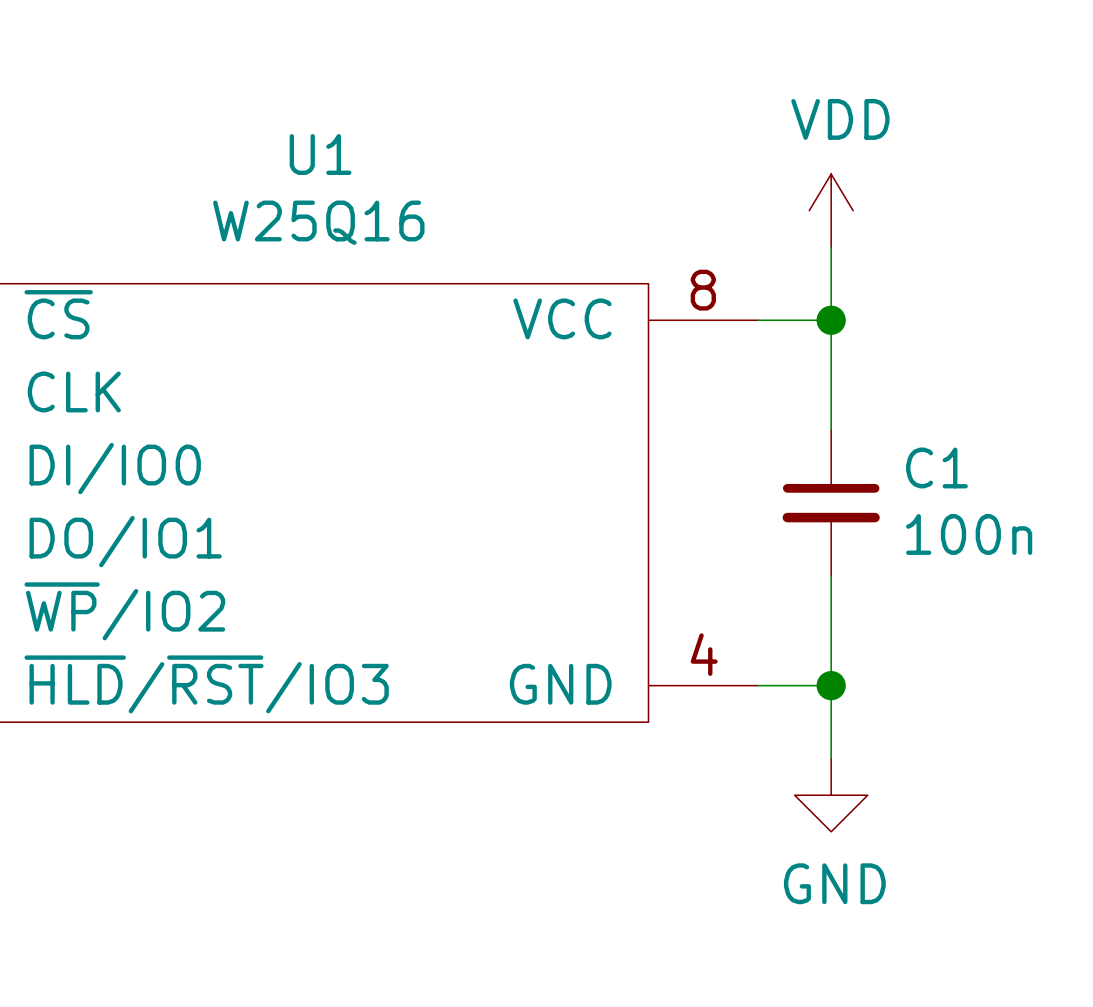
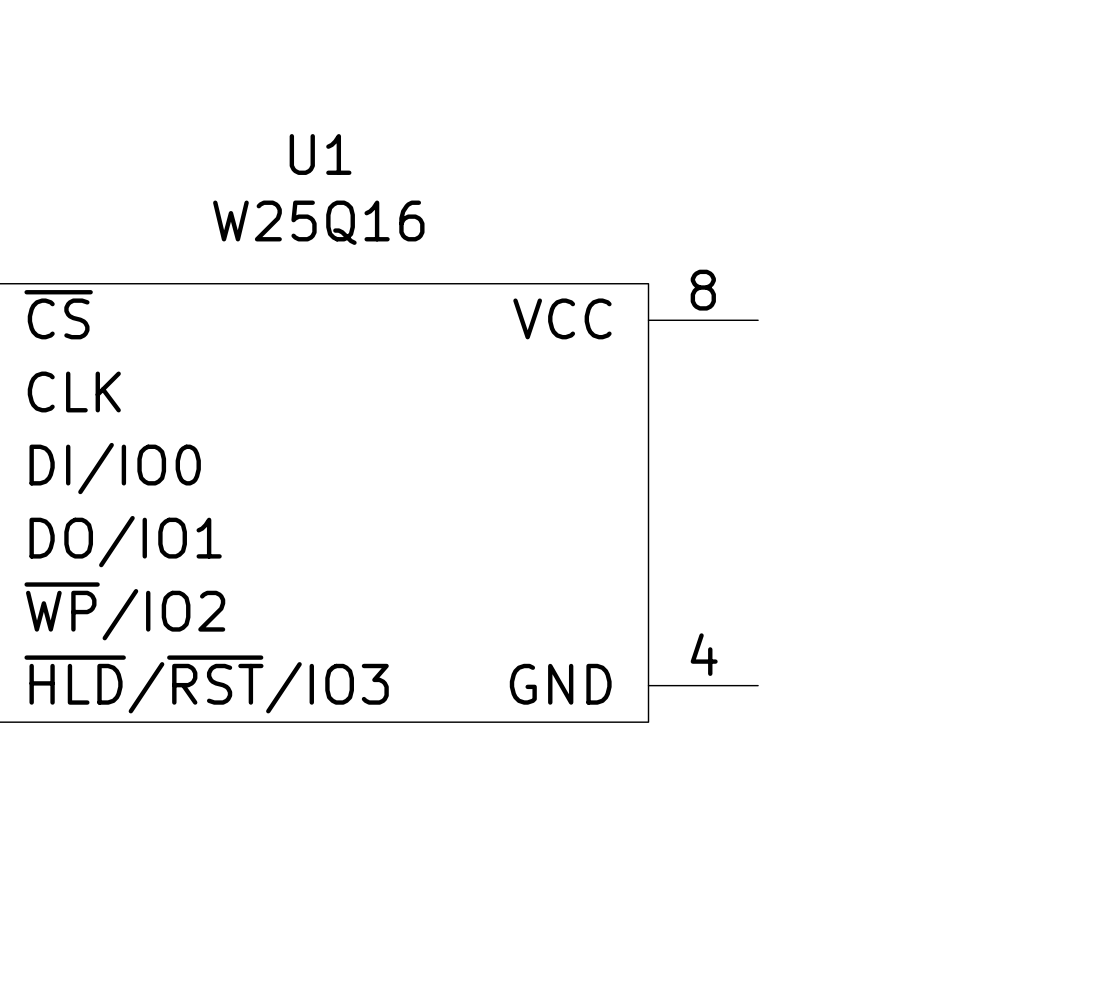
power symbol: VDD (831, 210) -> none
wire: (831, 247) (831, 429) -> none
wire: (758, 320) (831, 320) -> none
junction: (831, 320) -> none
C1: 100n (831, 502) -> none
wire: (831, 576) (831, 758) -> none
wire: (758, 685) (831, 685) -> none
junction: (831, 685) -> none
power symbol: GND (831, 795) -> none

